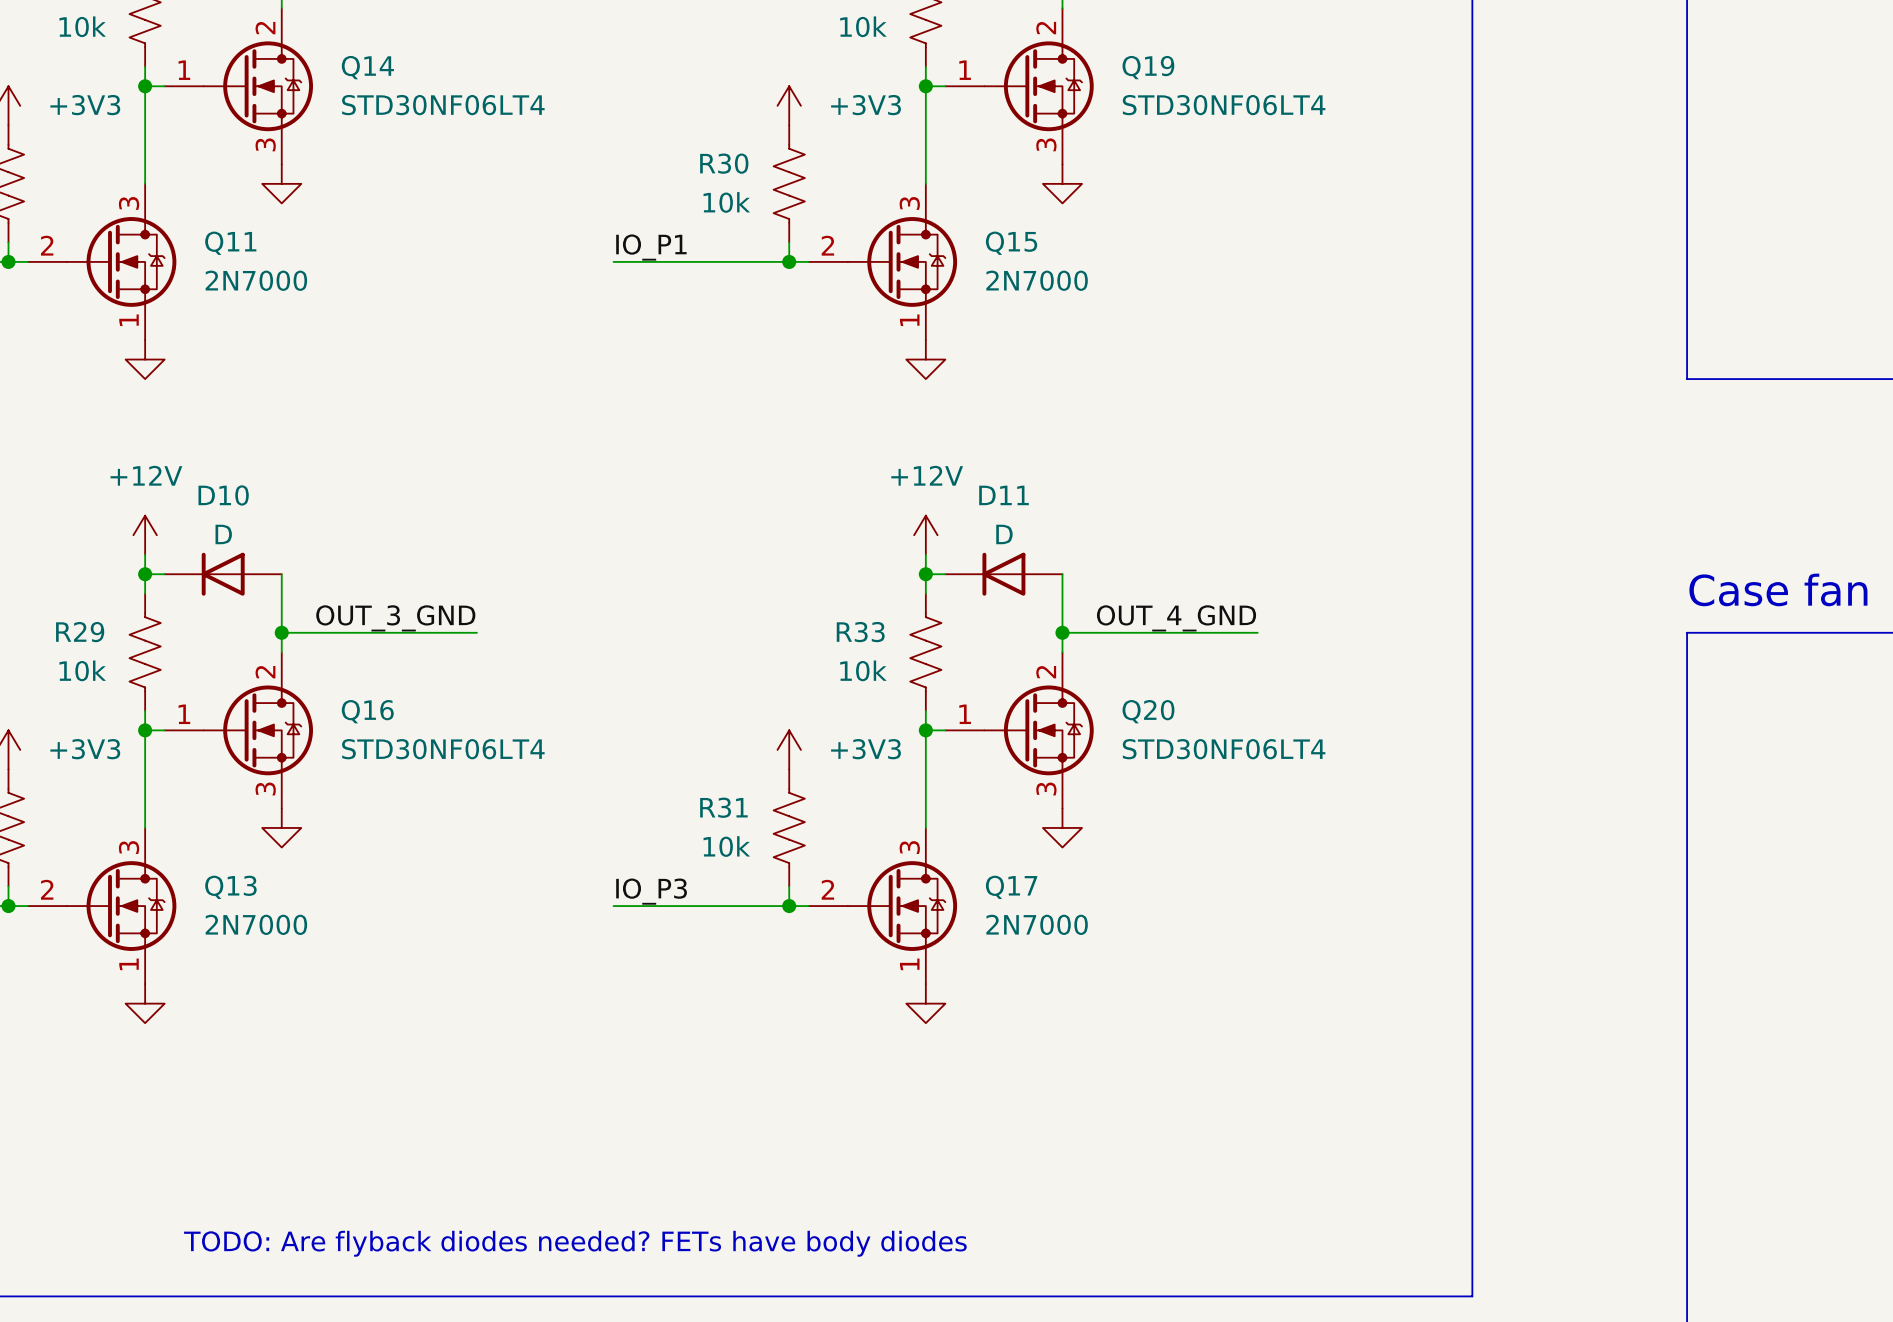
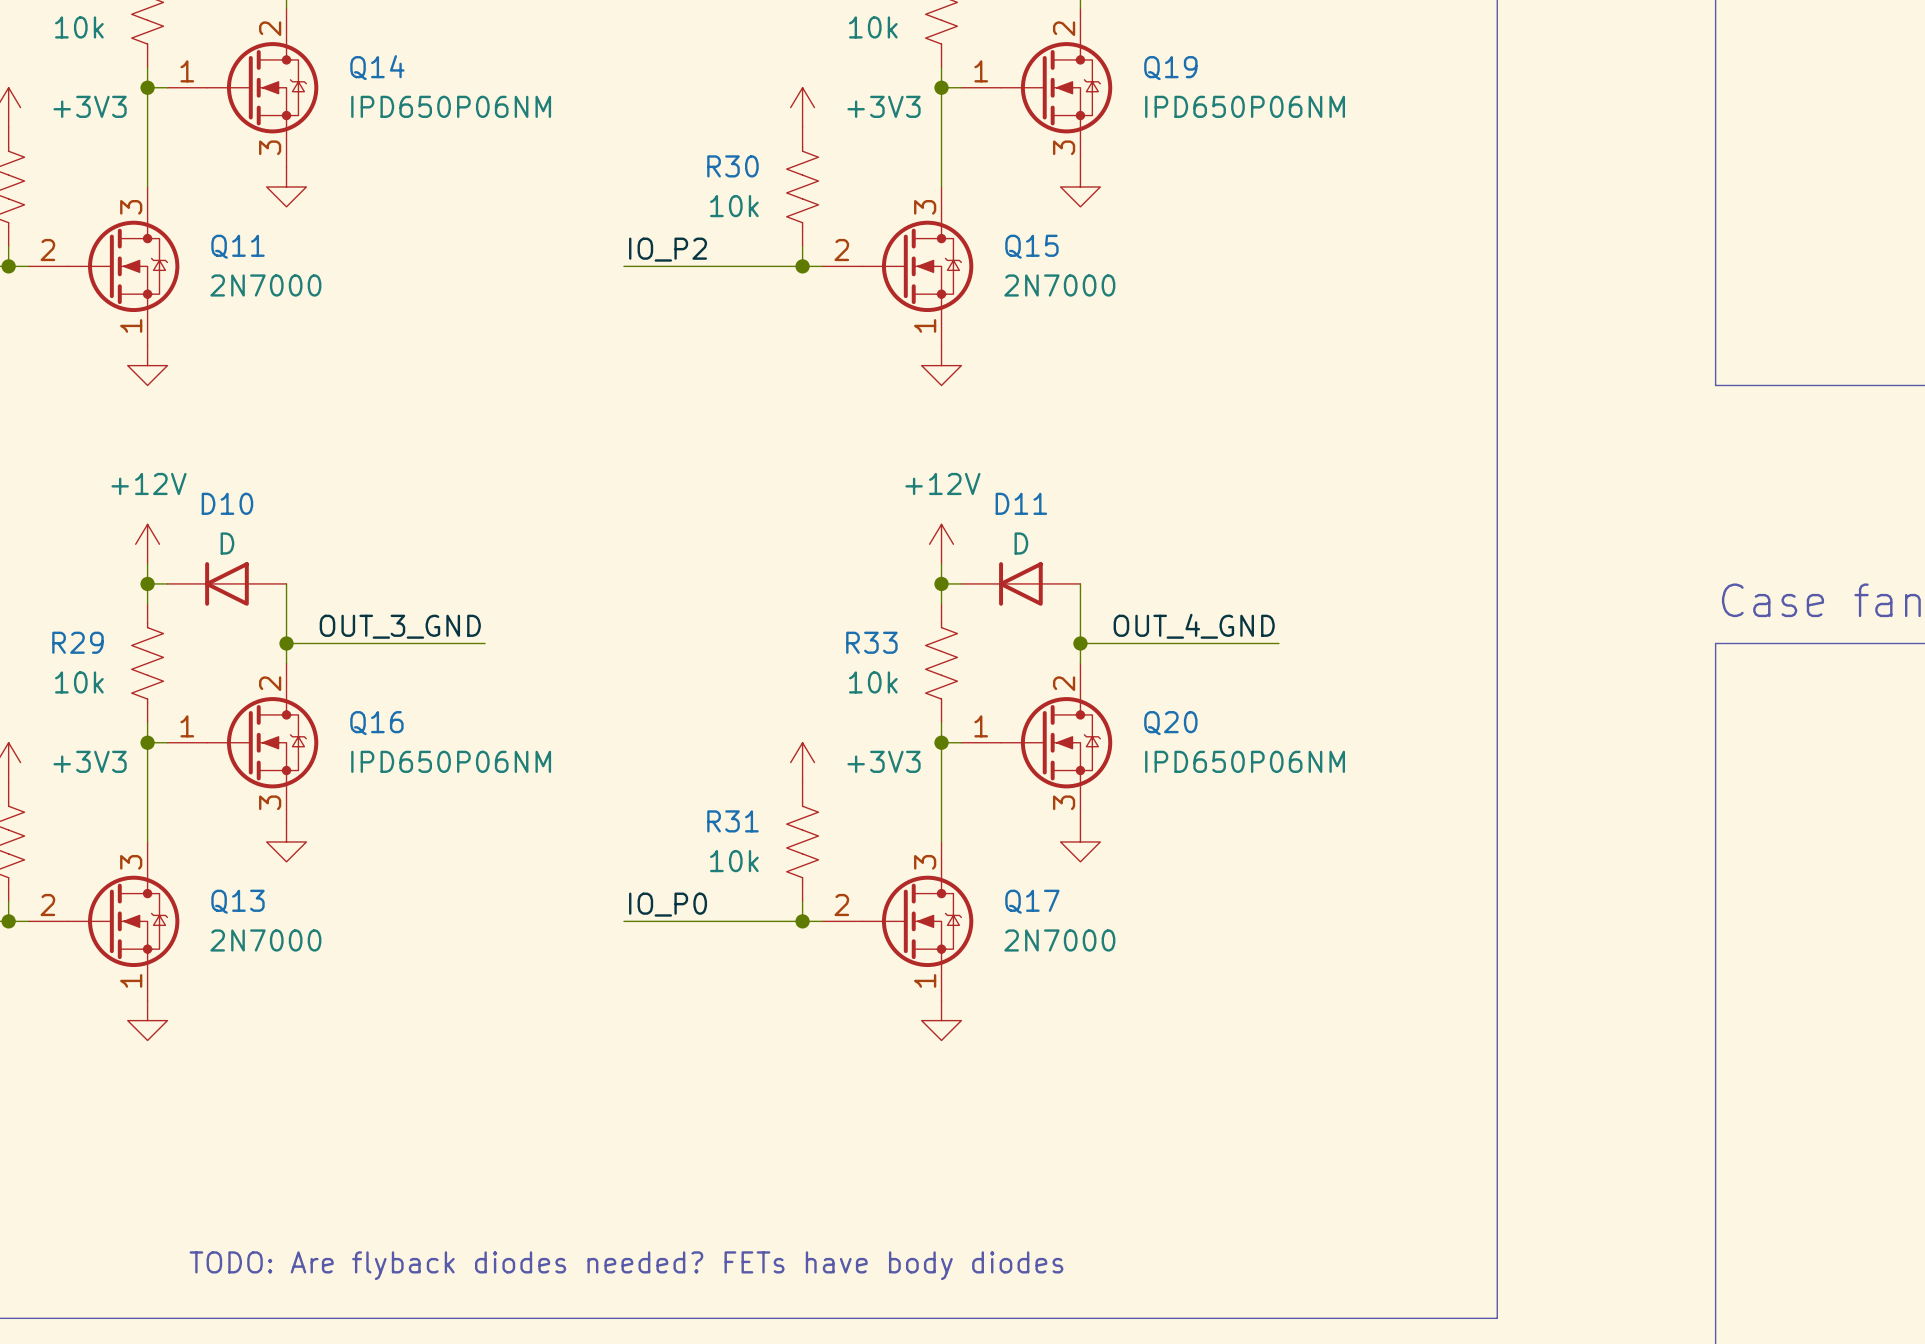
Q14 value: STD30NF06LT4 (443, 105) -> IPD650P06NM (451, 106)
Q19 value: STD30NF06LT4 (1224, 105) -> IPD650P06NM (1245, 106)
label: IO_P1 (651, 247) -> IO_P2 (668, 249)
Q16 value: STD30NF06LT4 (443, 749) -> IPD650P06NM (451, 761)
Q20 value: STD30NF06LT4 (1224, 749) -> IPD650P06NM (1245, 761)
label: IO_P3 (651, 891) -> IO_P0 (668, 904)

